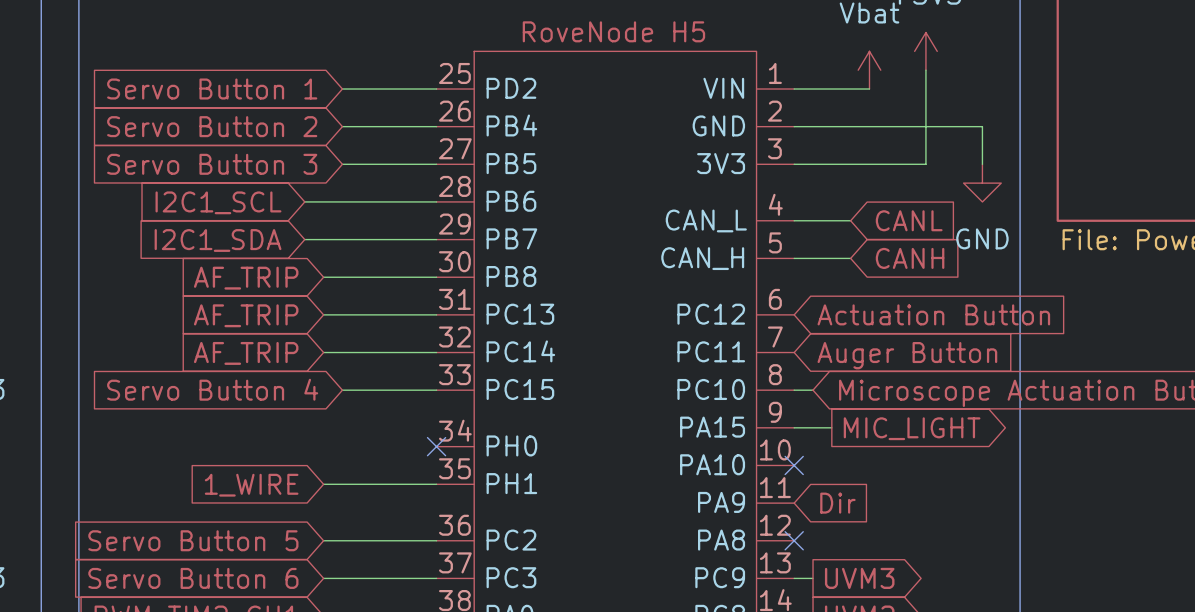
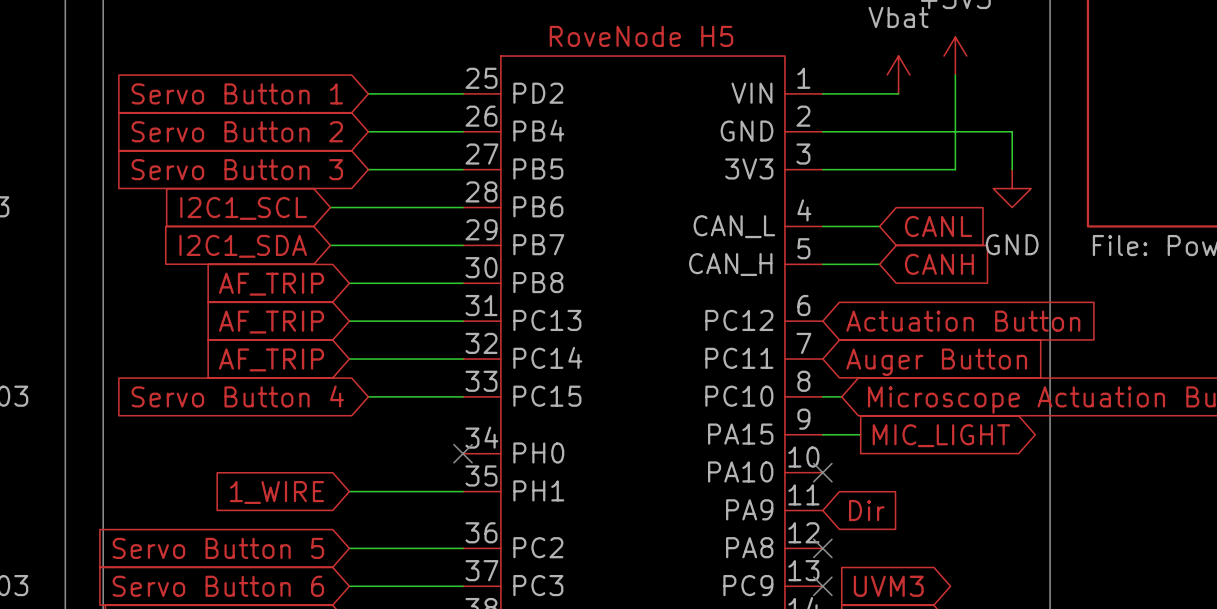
wire: (794, 578) (813, 578) -> none
no-connect mark: none -> (822, 586)

